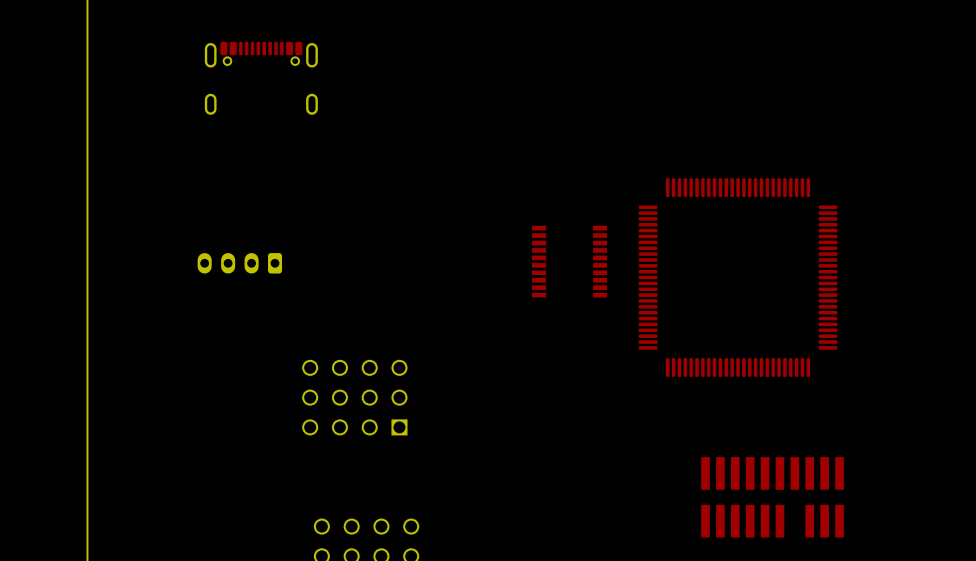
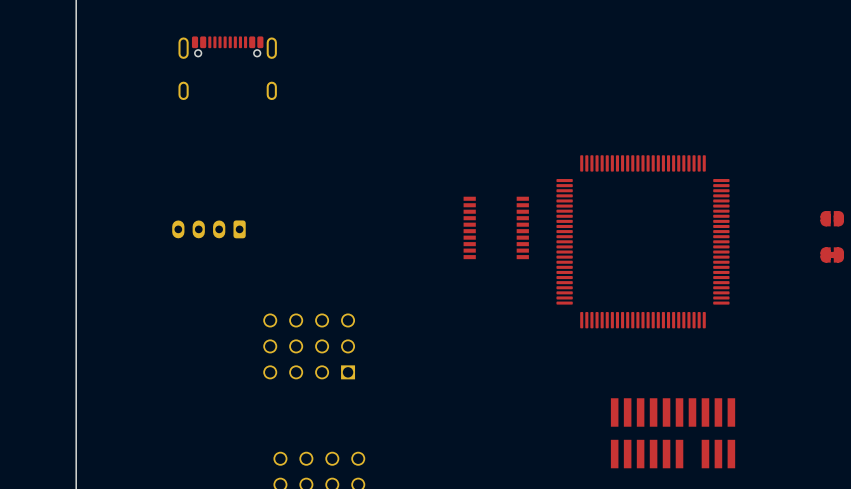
part: none -> (832, 218)
part: none -> (832, 254)

